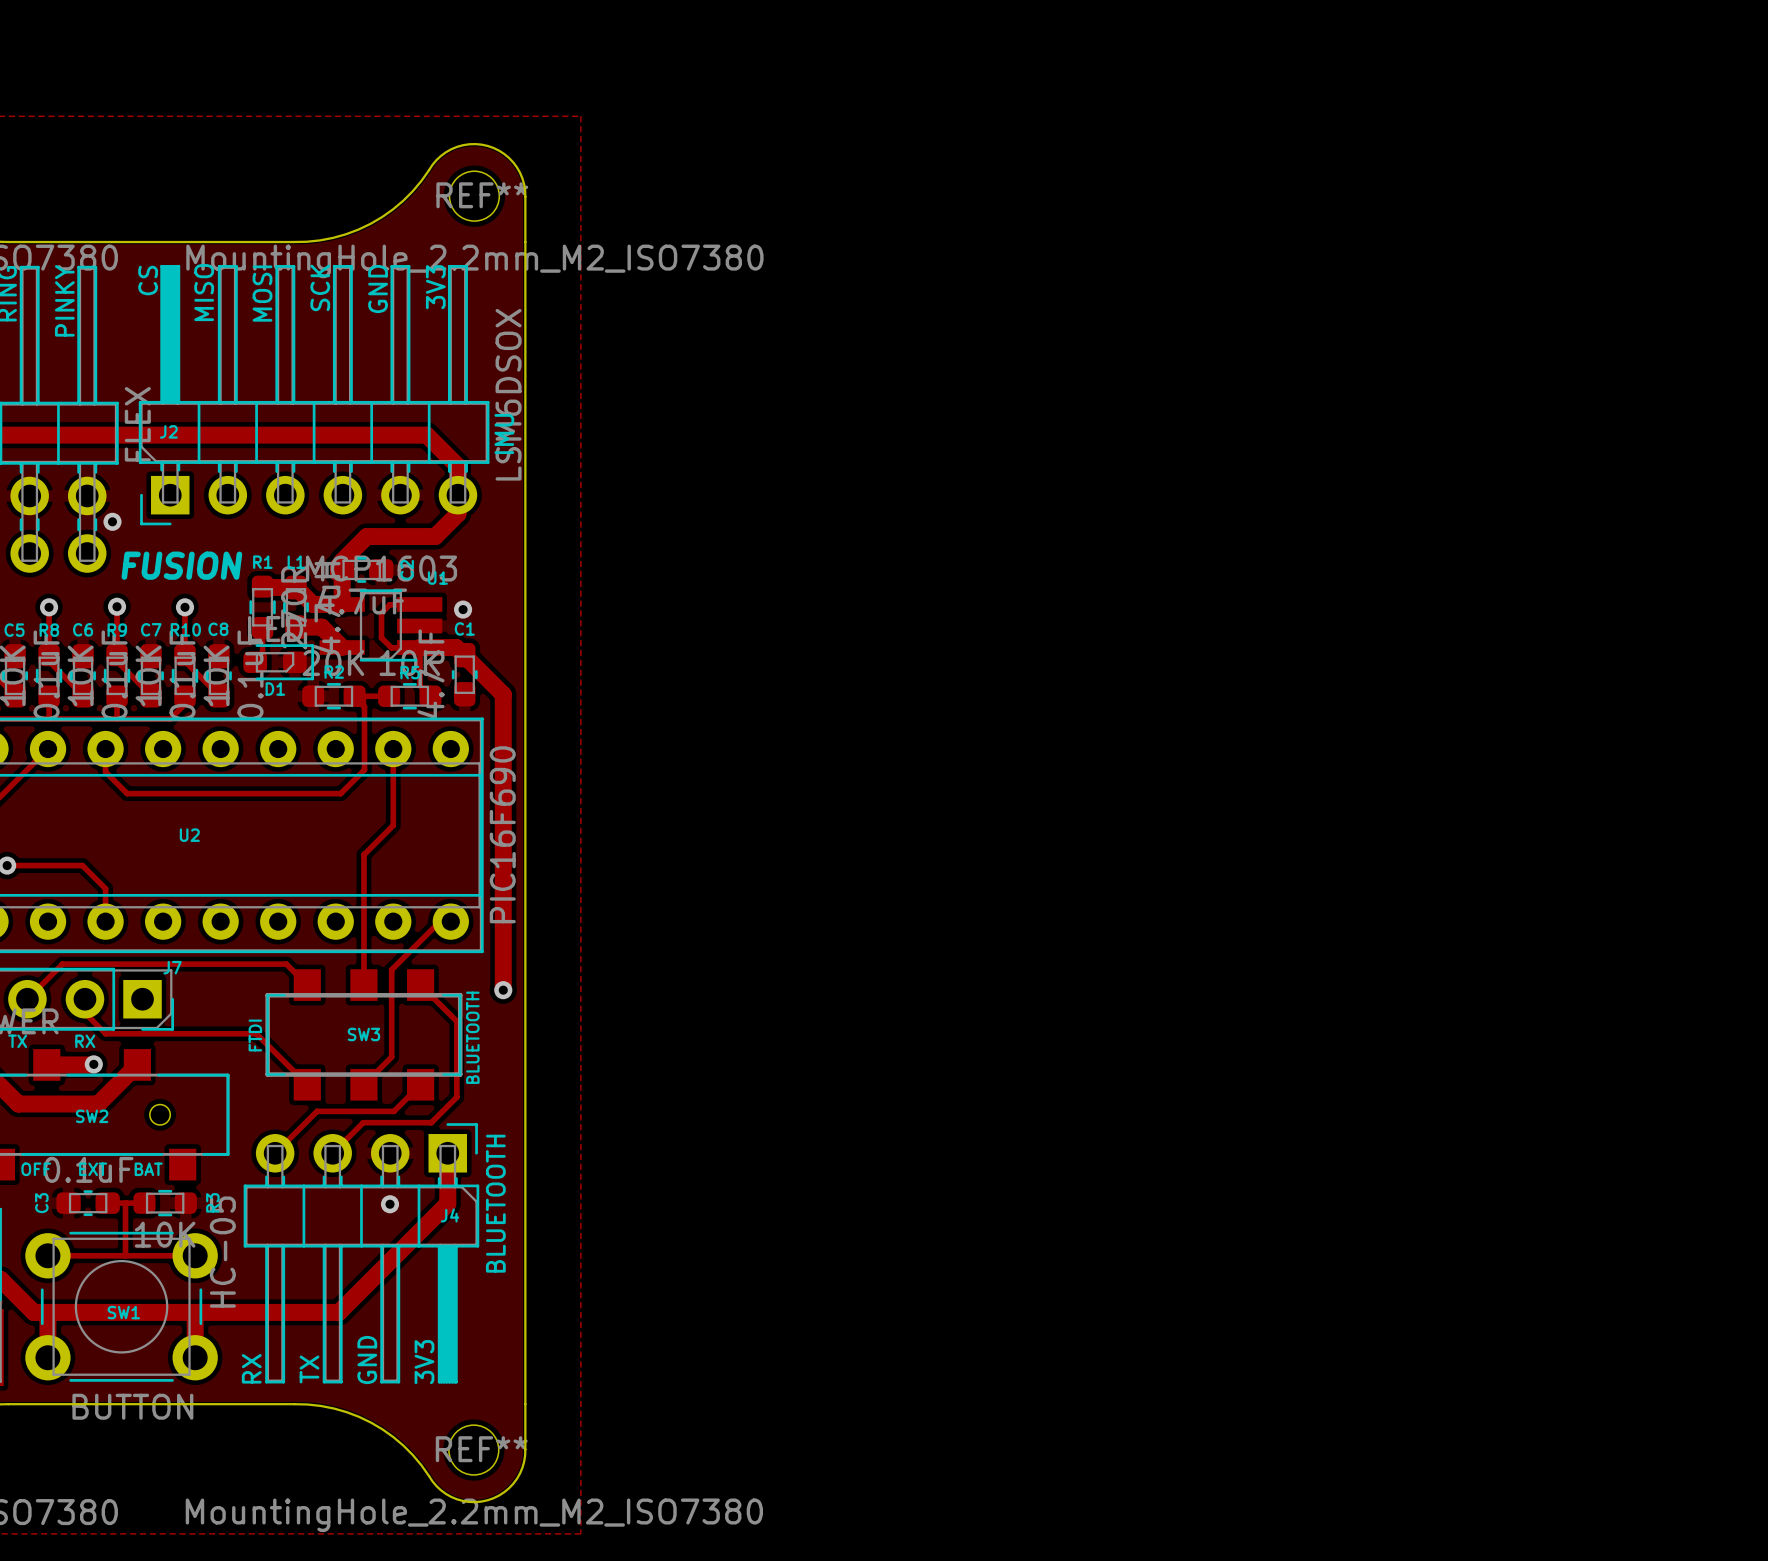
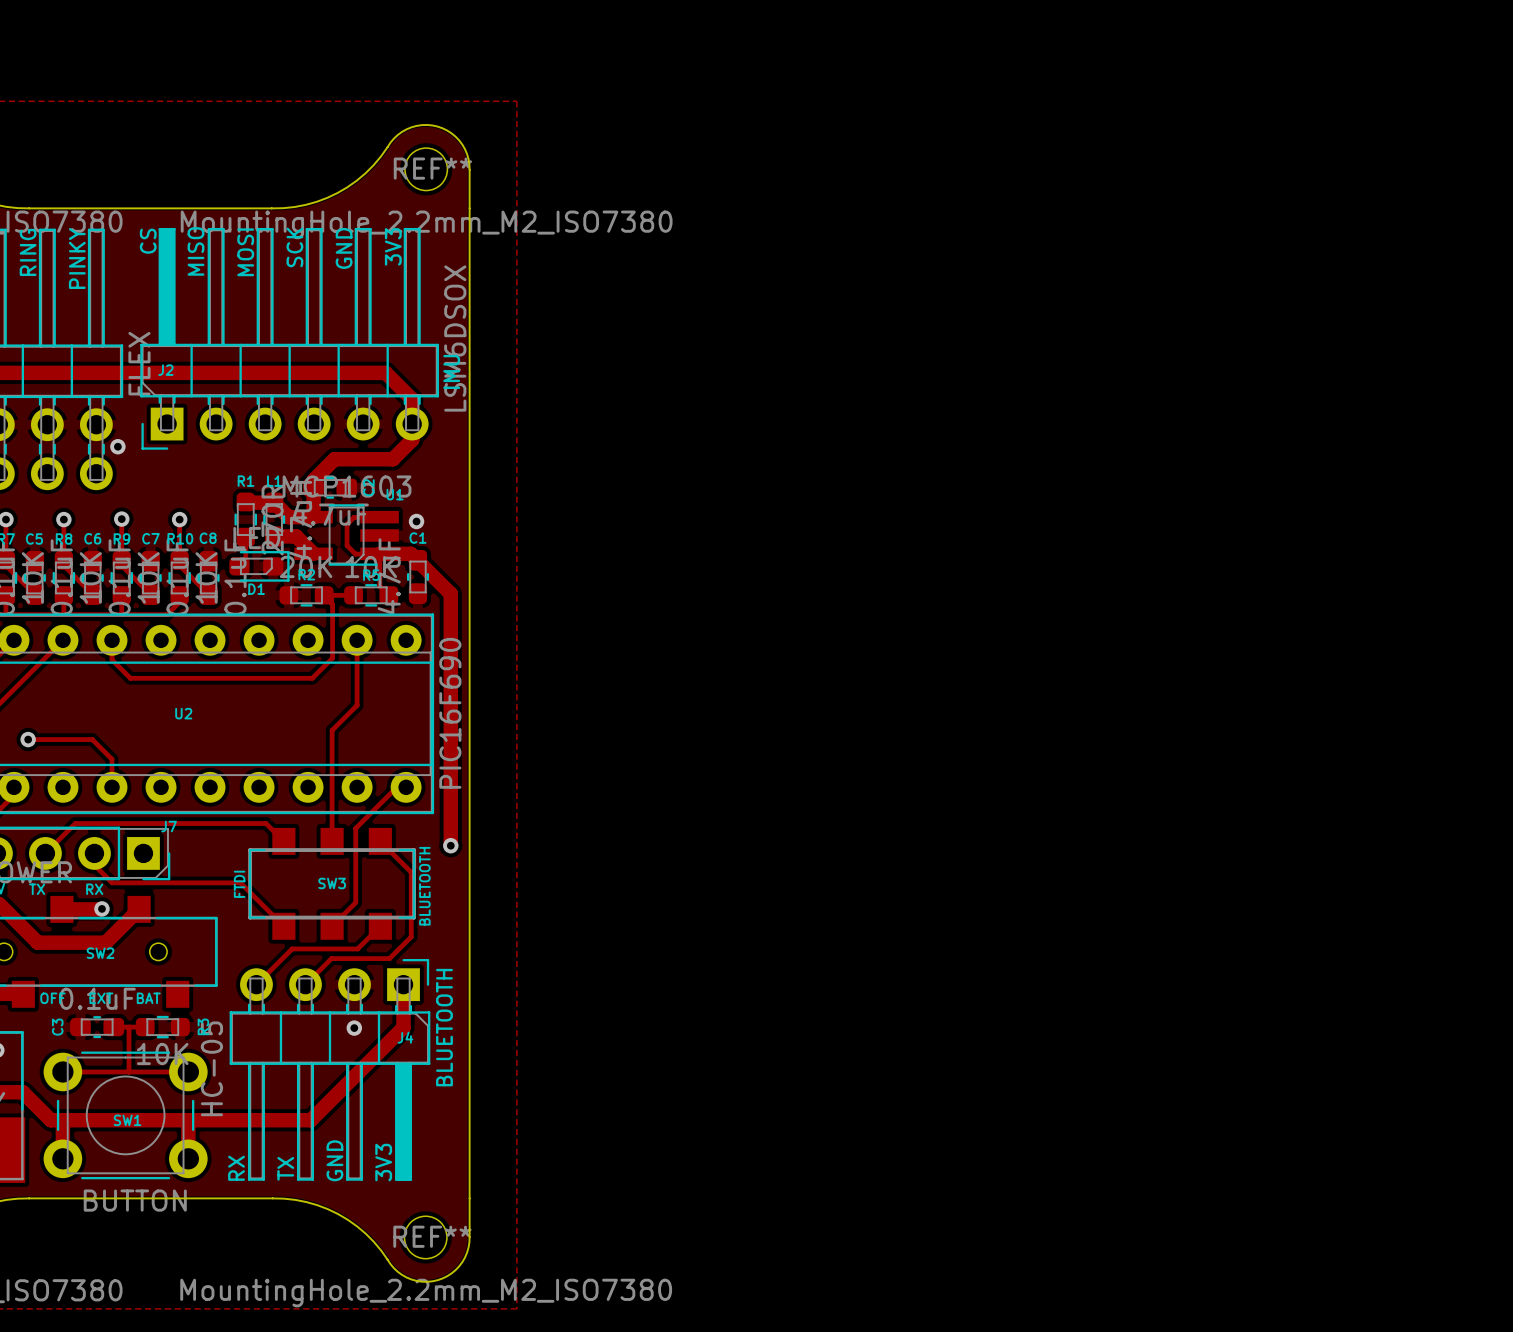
text: FUSION (181, 565) -> none

